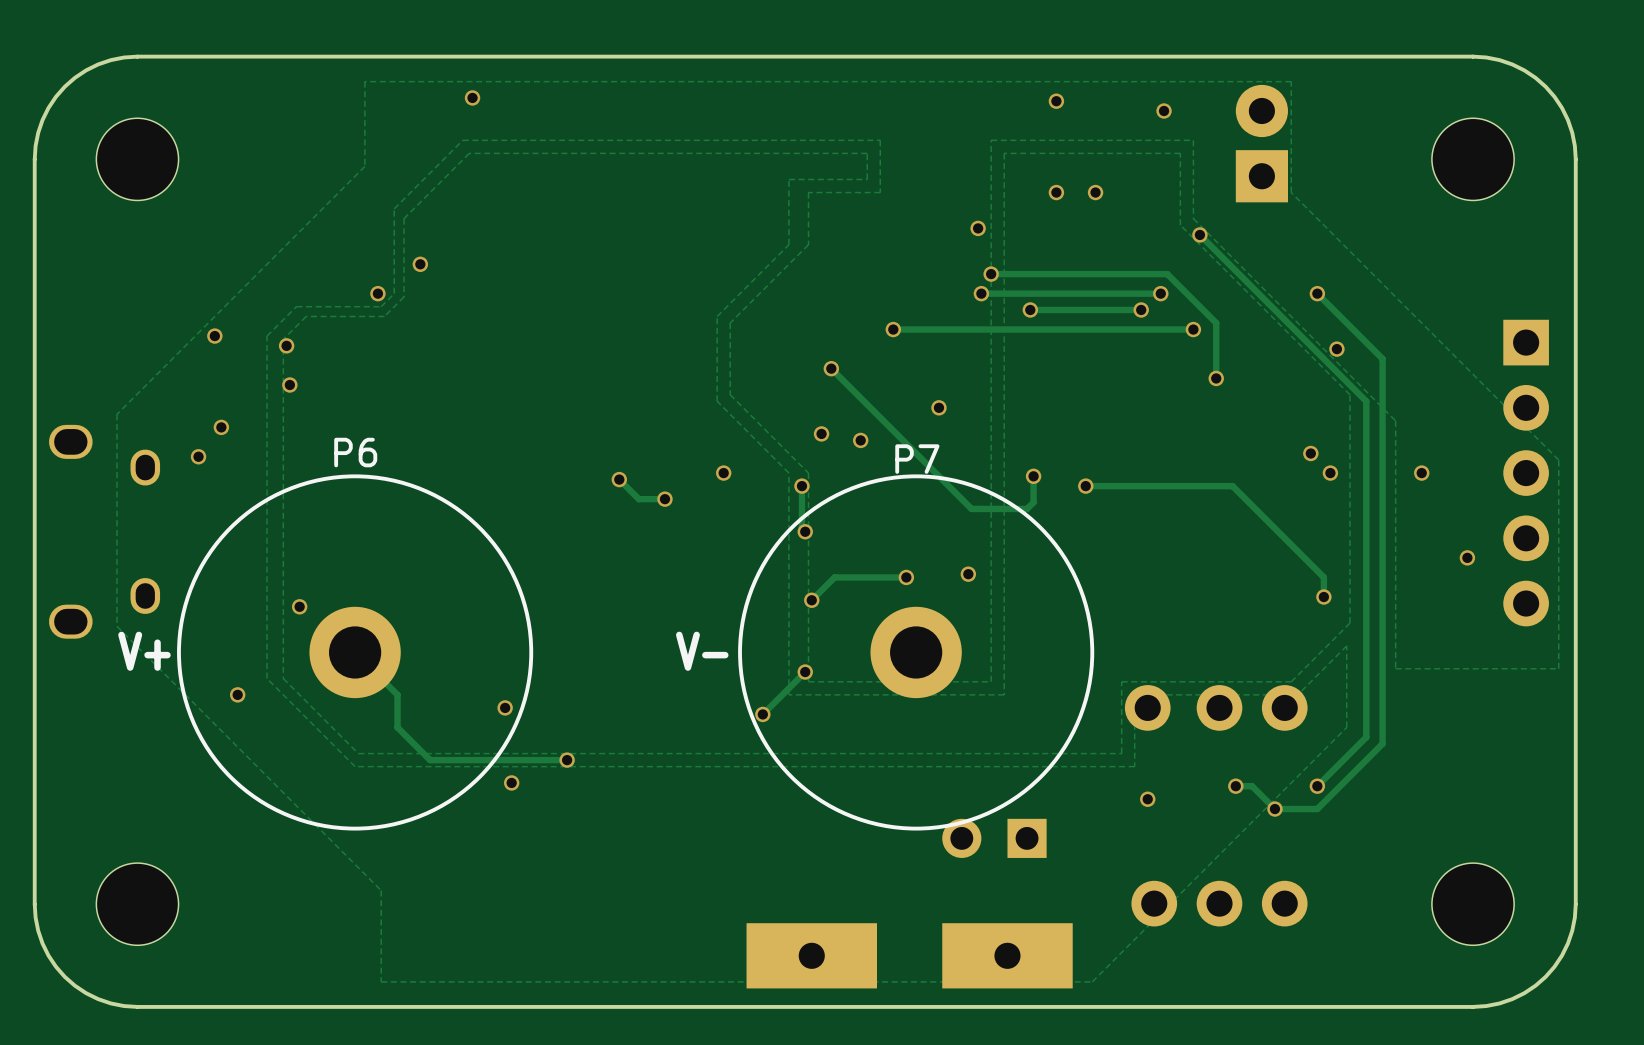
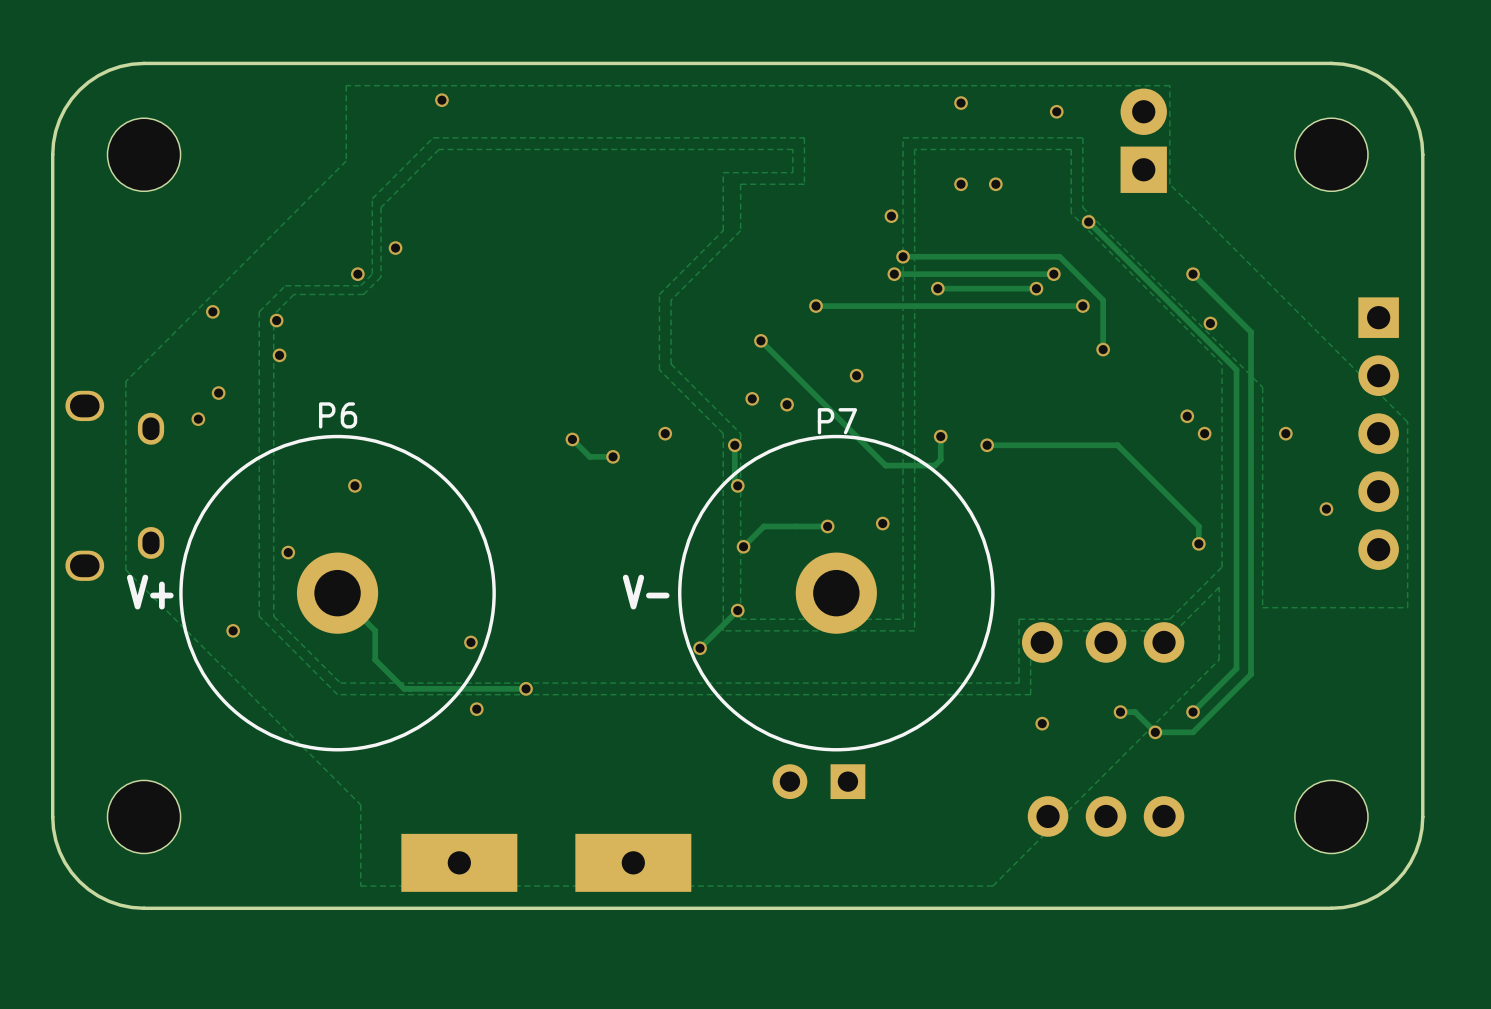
via: none -> (354, 485)
part position: (994, 838) -> (818, 781)
part: none -> (459, 862)
part position: (811, 955) -> (633, 862)
part: (1007, 955) -> none

